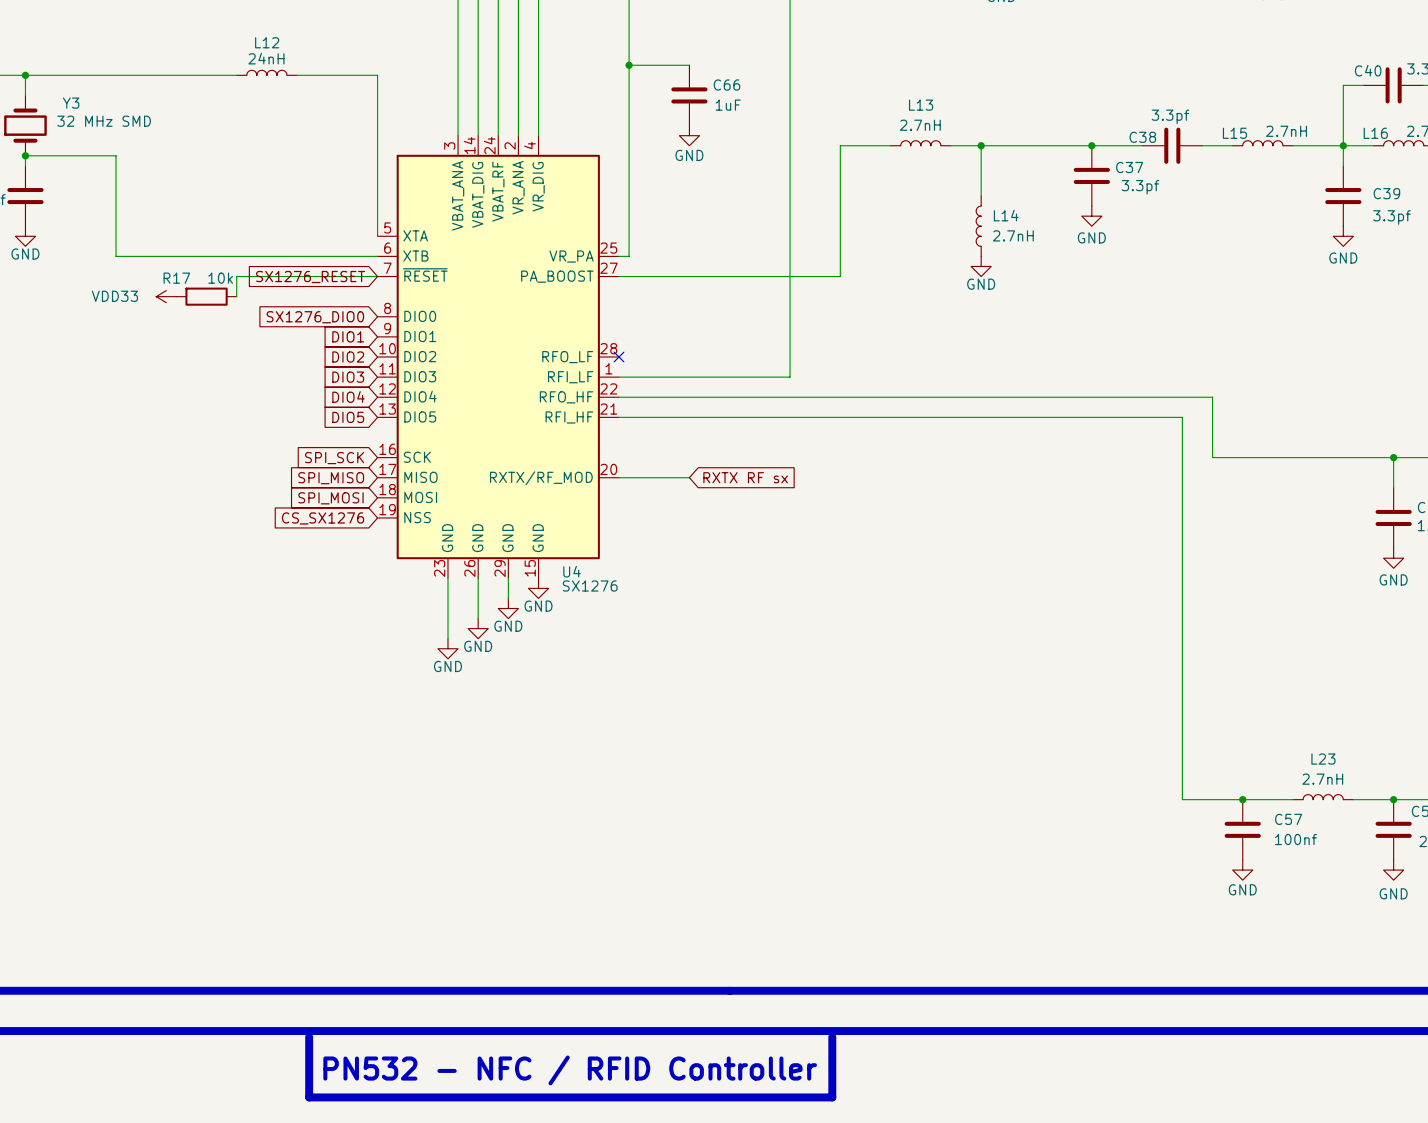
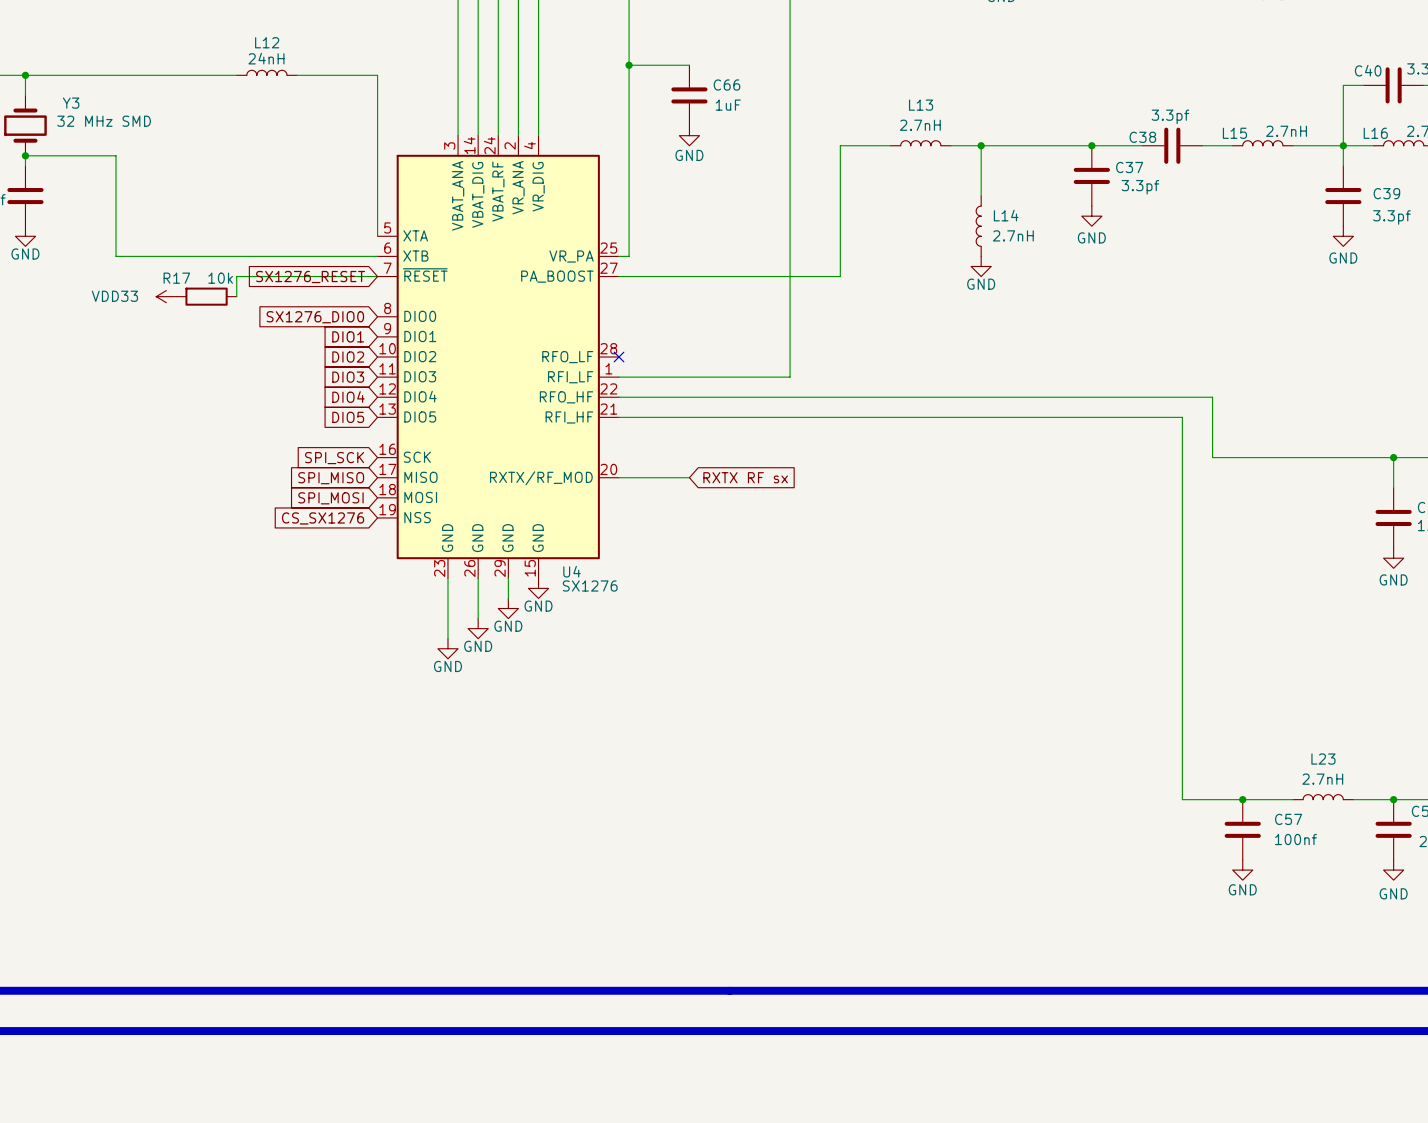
line: (309, 1037) (309, 1097) (832, 1097) (832, 1037) -> none
text: PN532 - NFC / RFID Controller (570, 1070) -> none

